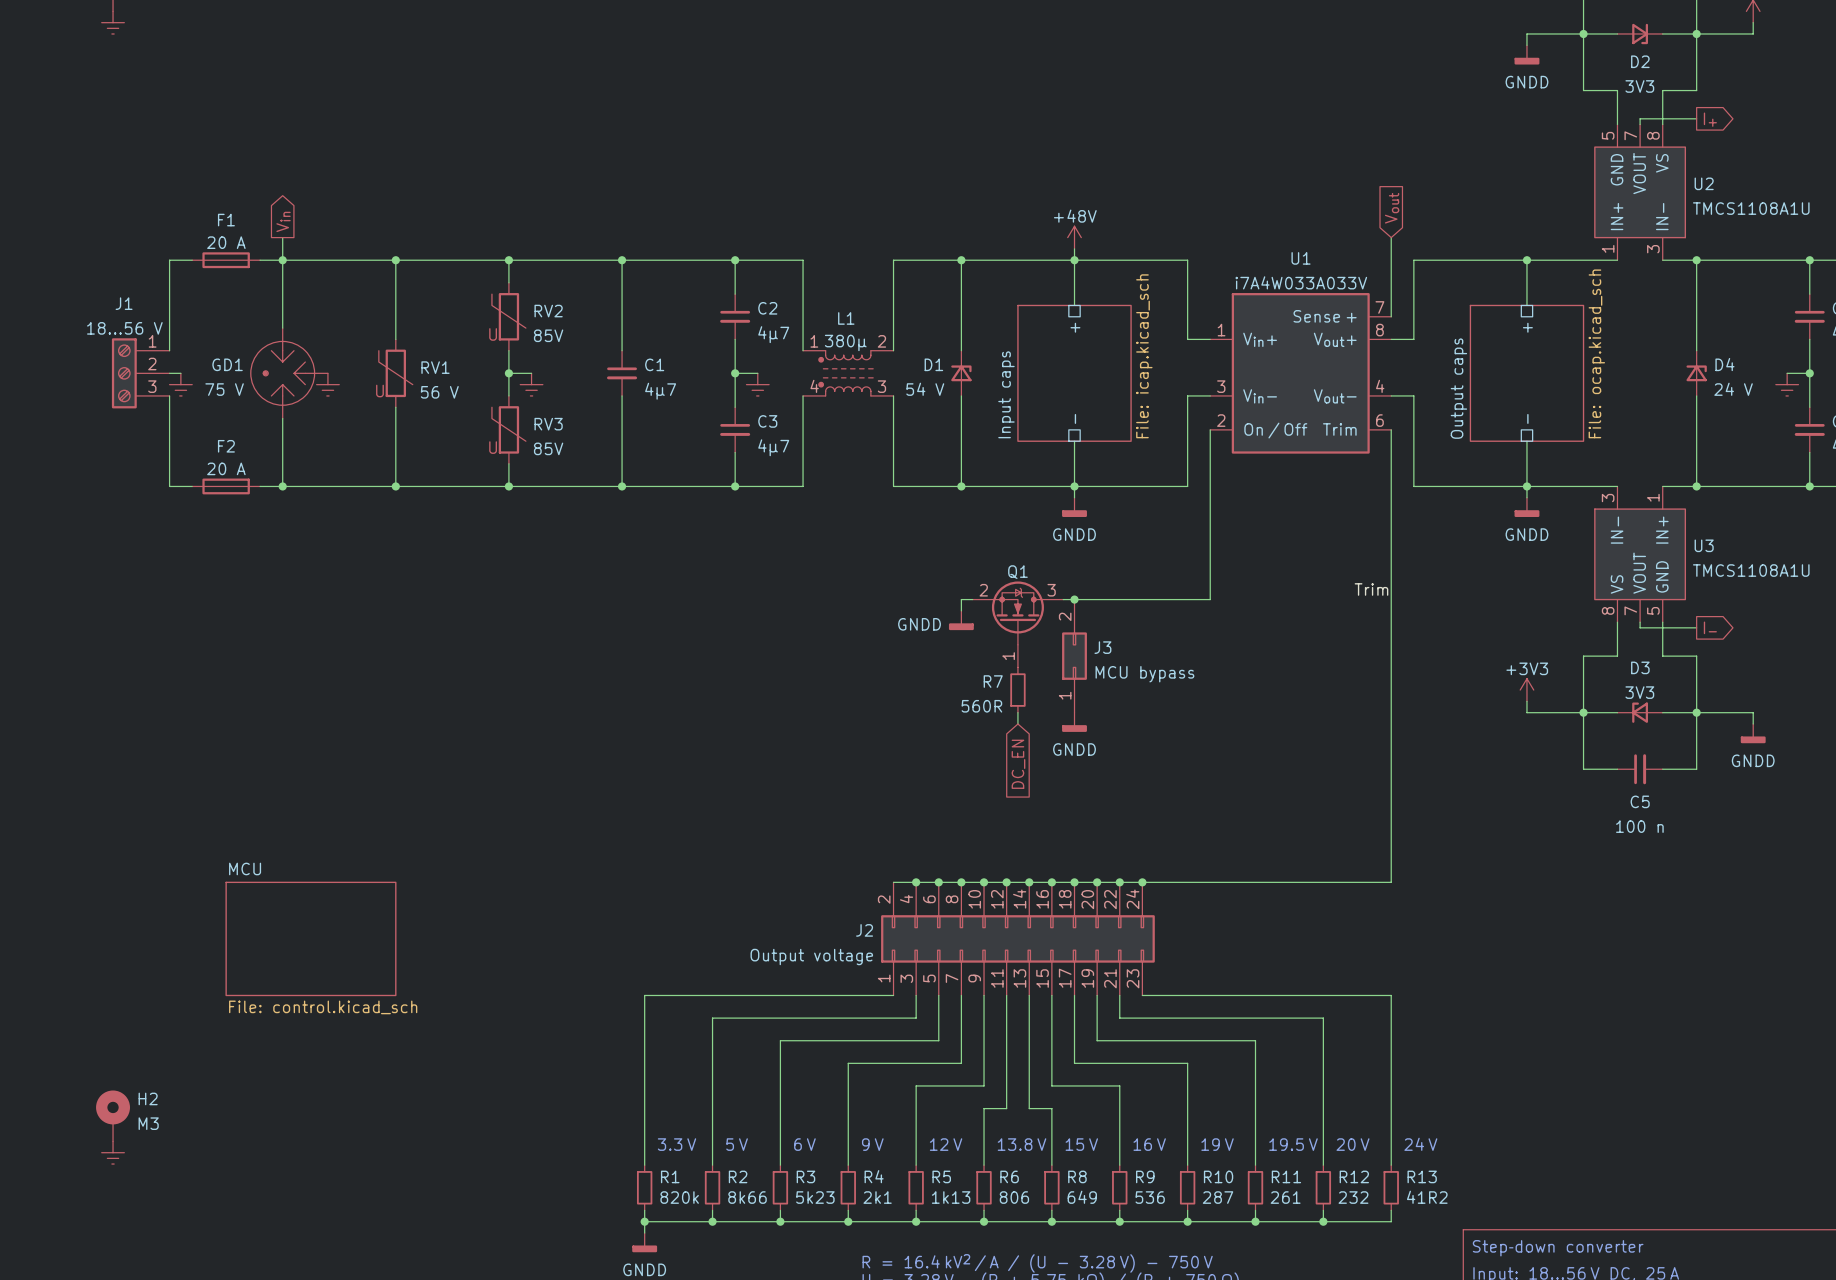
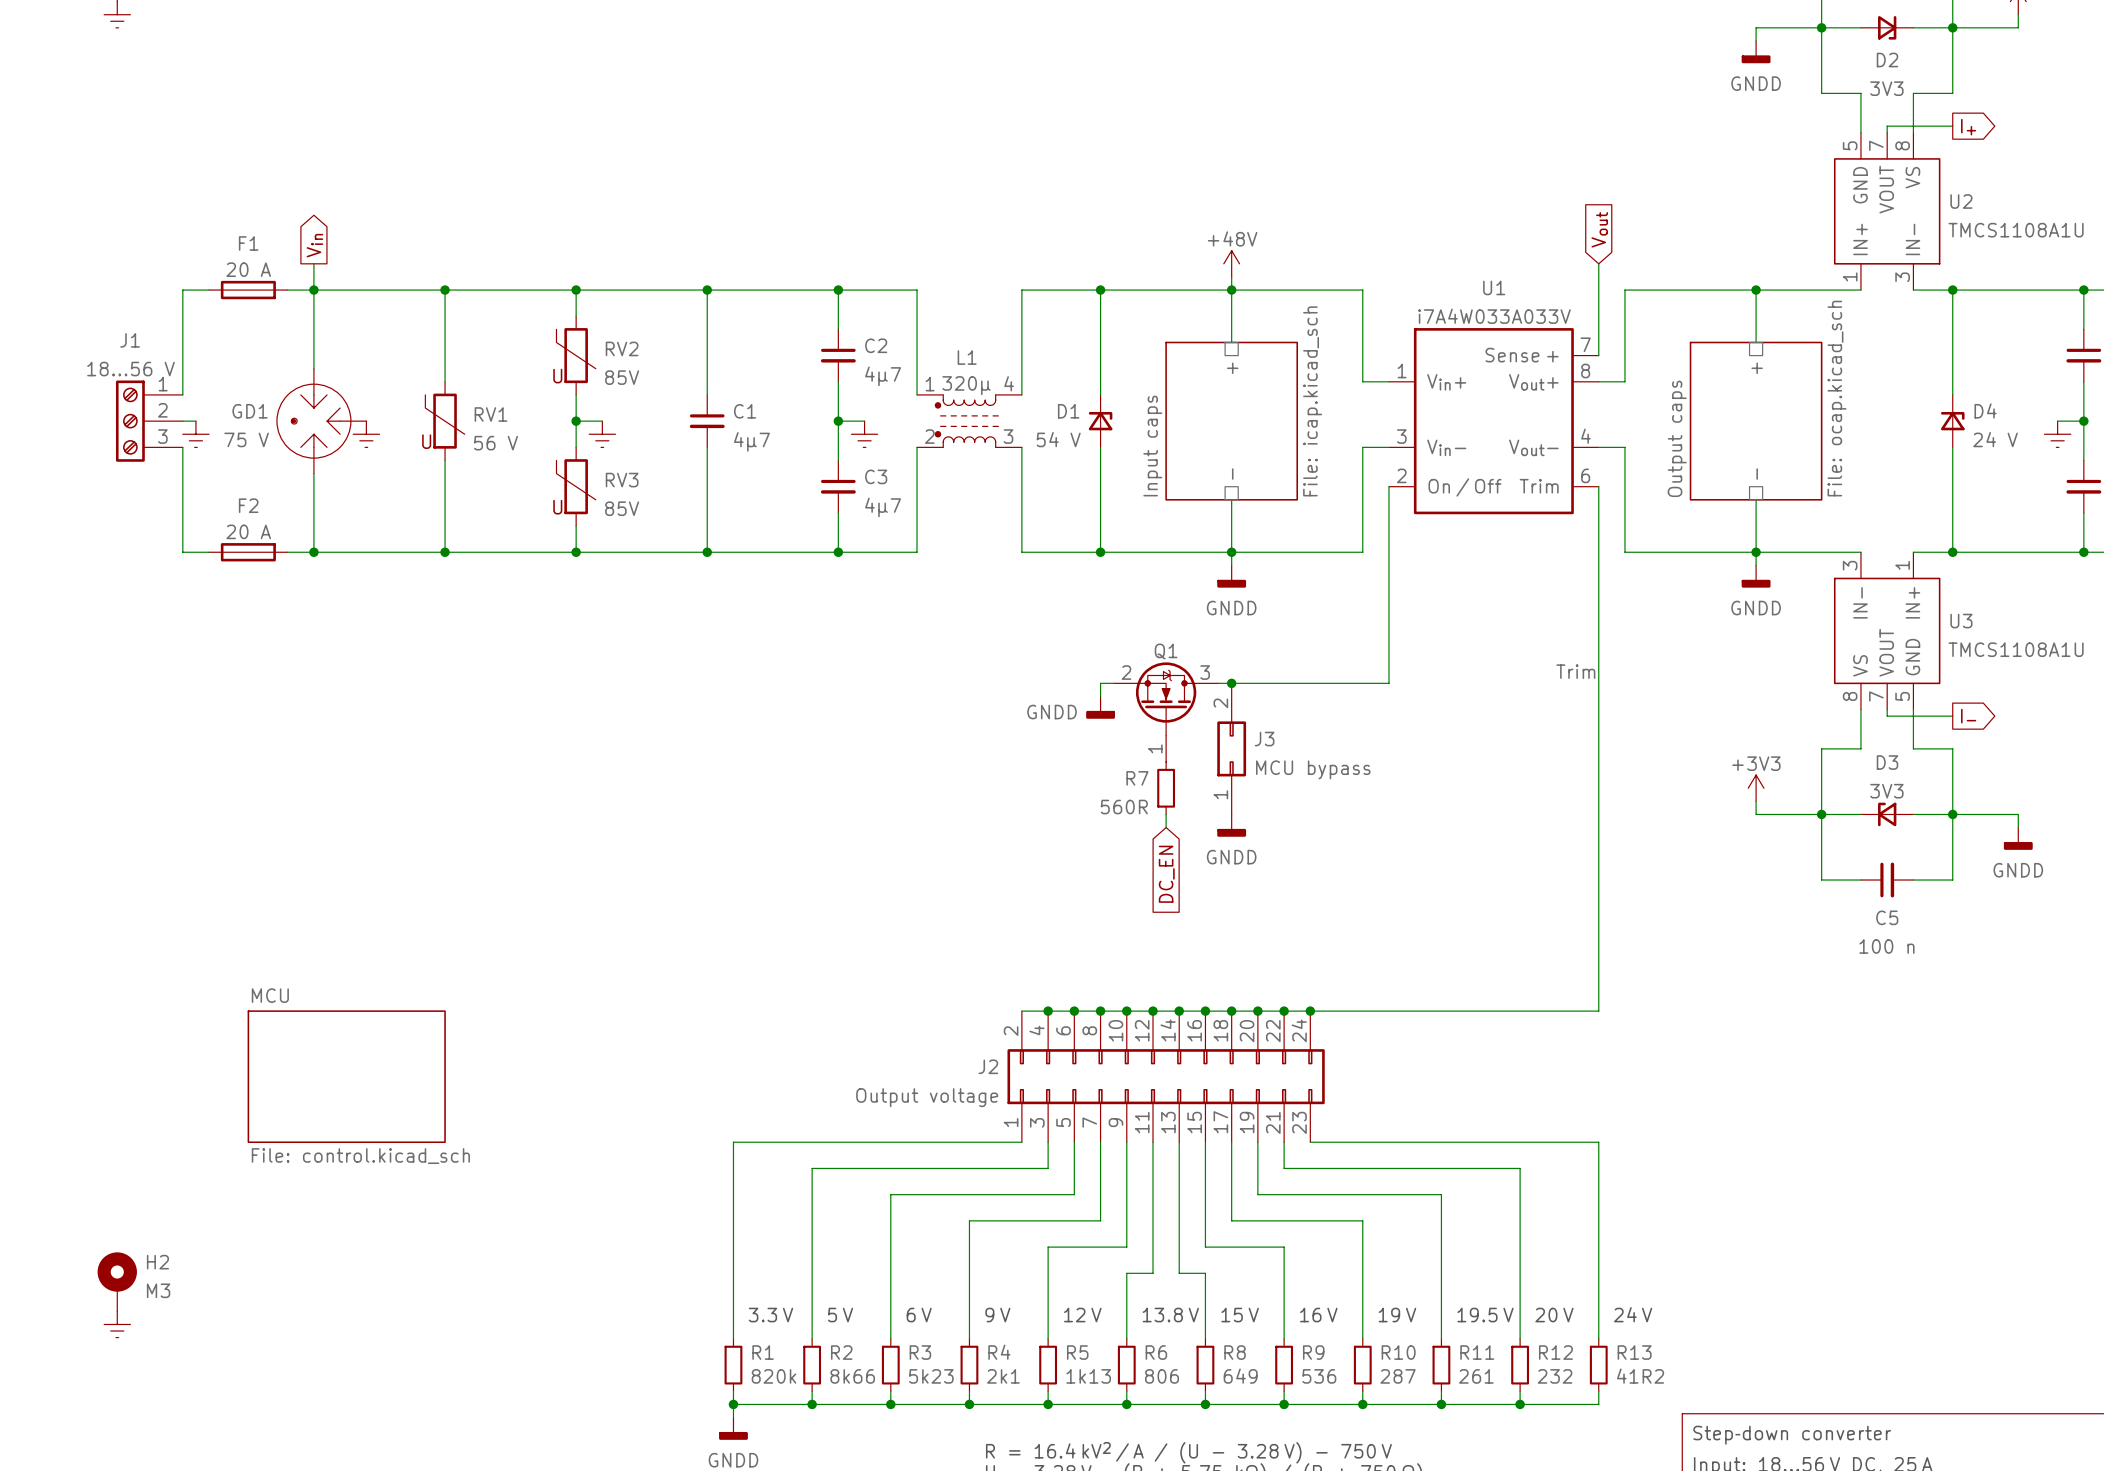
L1 pin number: 2 (881, 341) -> 4 (1009, 383)
L1 value: 380µ (845, 342) -> 320µ (966, 385)
L1 pin number: 4 (814, 386) -> 2 (929, 436)

